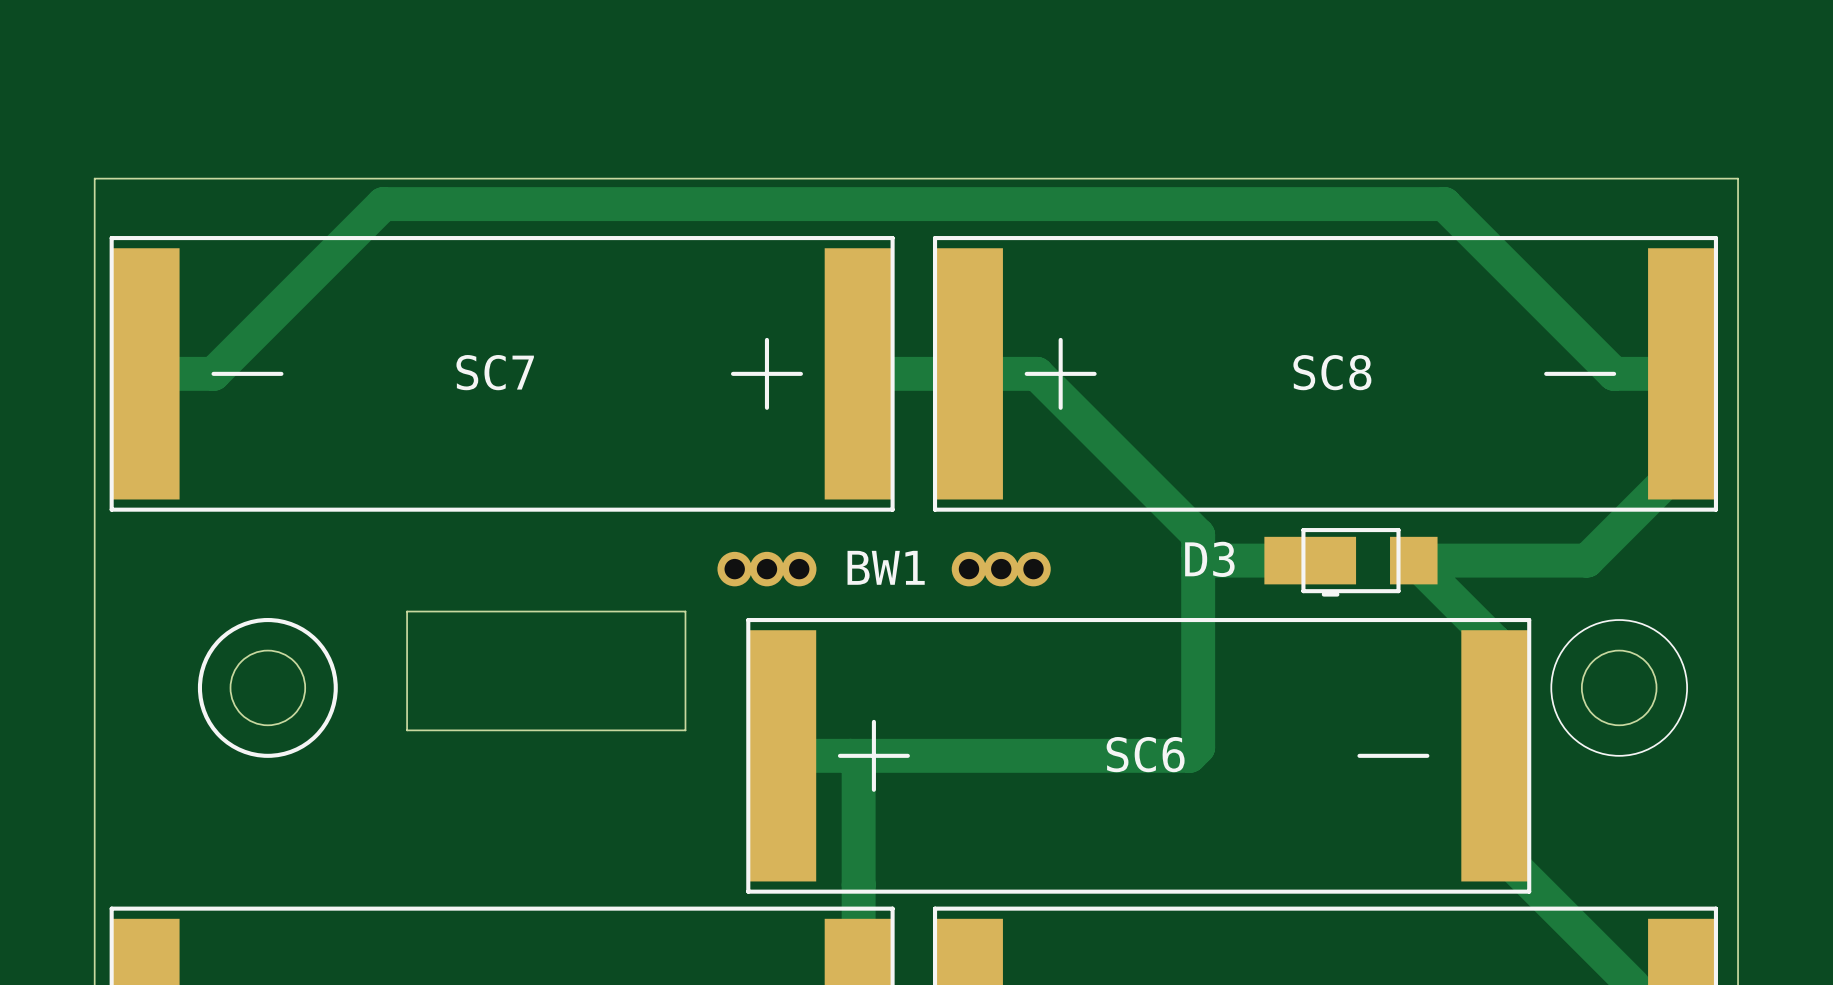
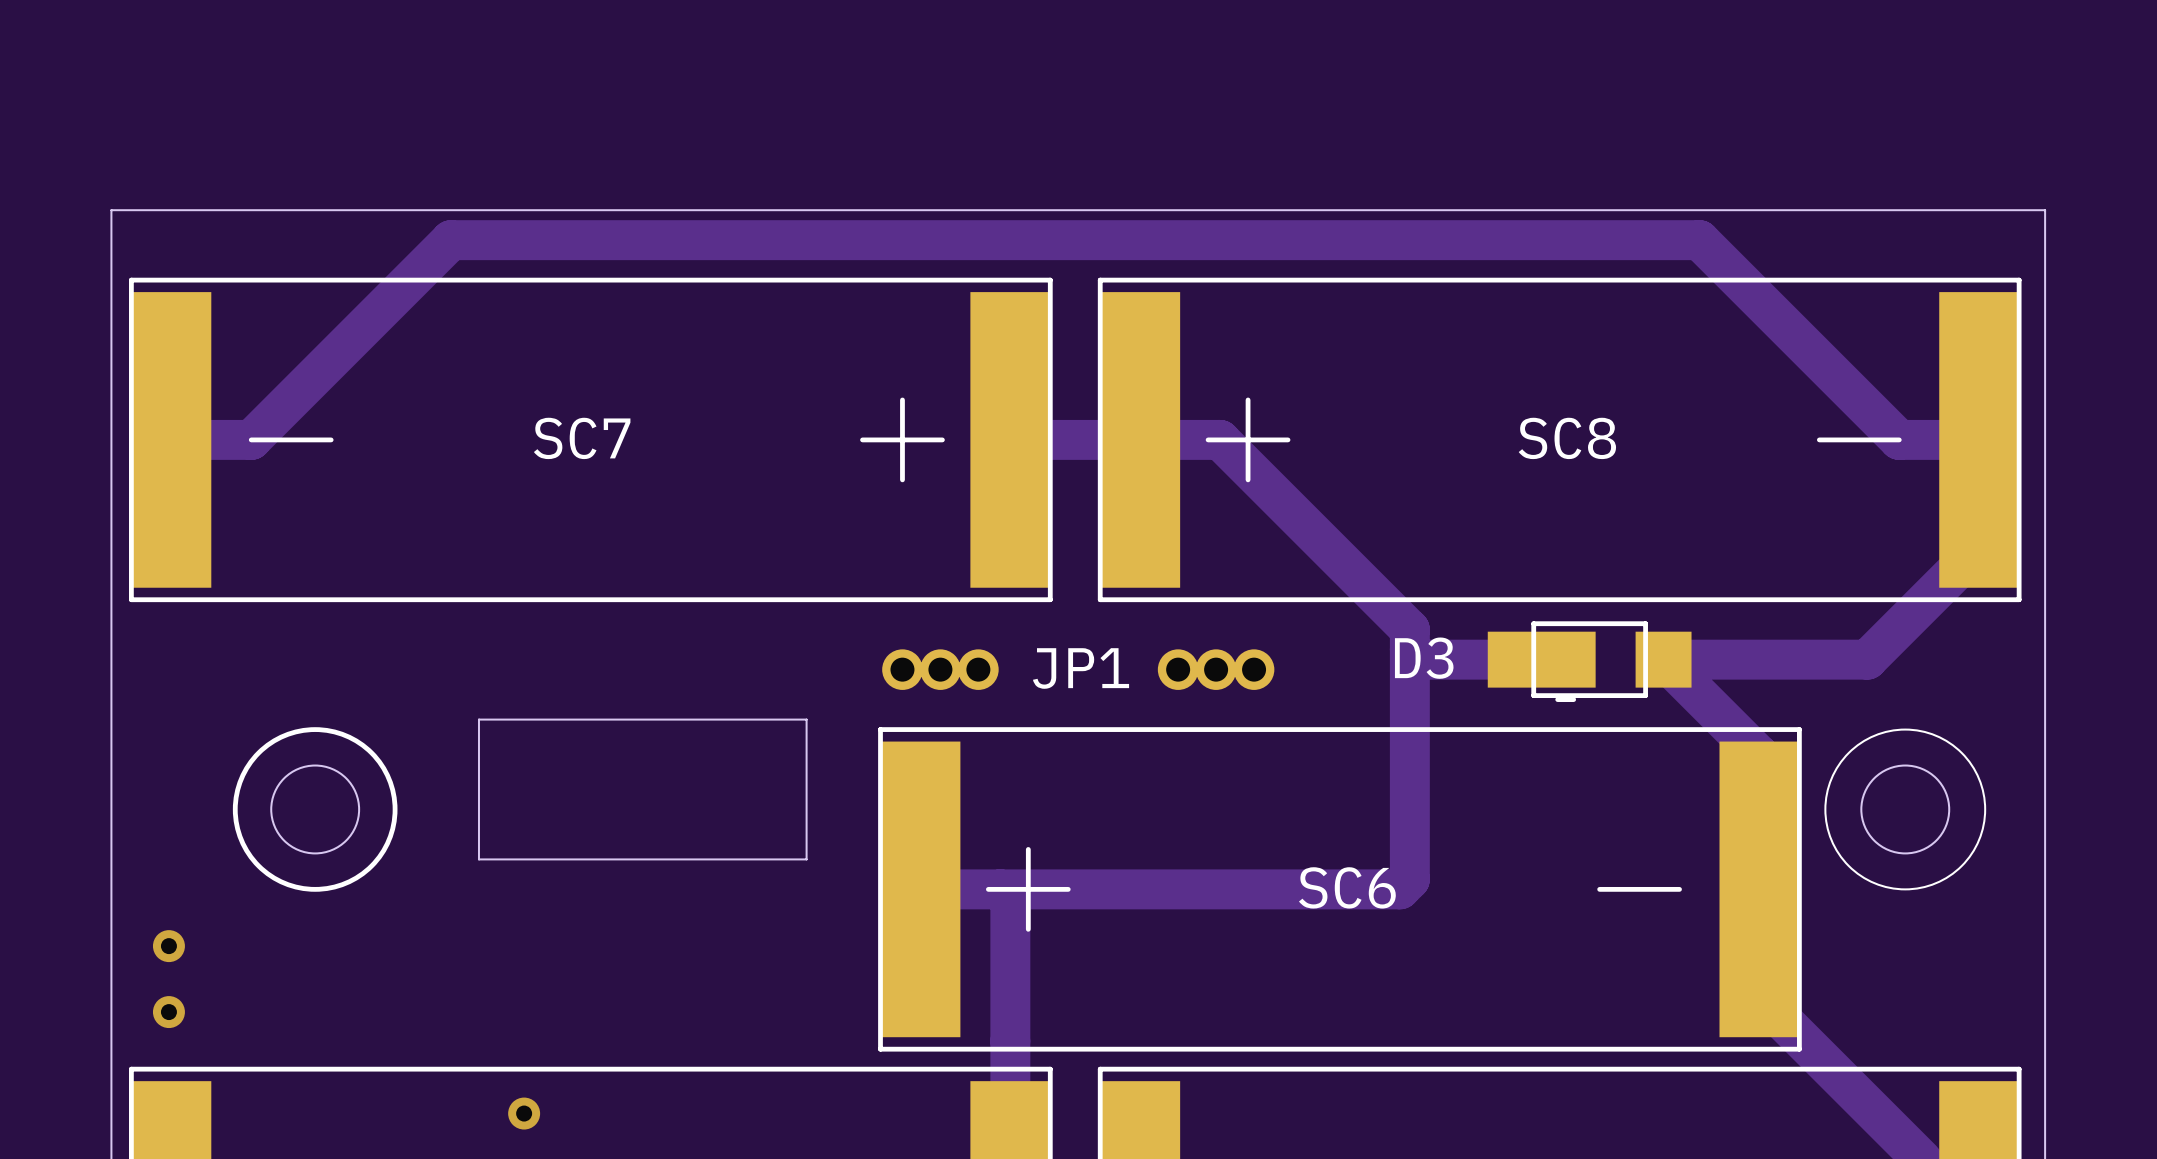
BW1 name: BW1 (886, 567) -> JP1 (1081, 668)
BW1 position: (884, 569) -> (1078, 669)
via: none -> (168, 946)
via: none -> (168, 1012)
via: none -> (524, 1113)

